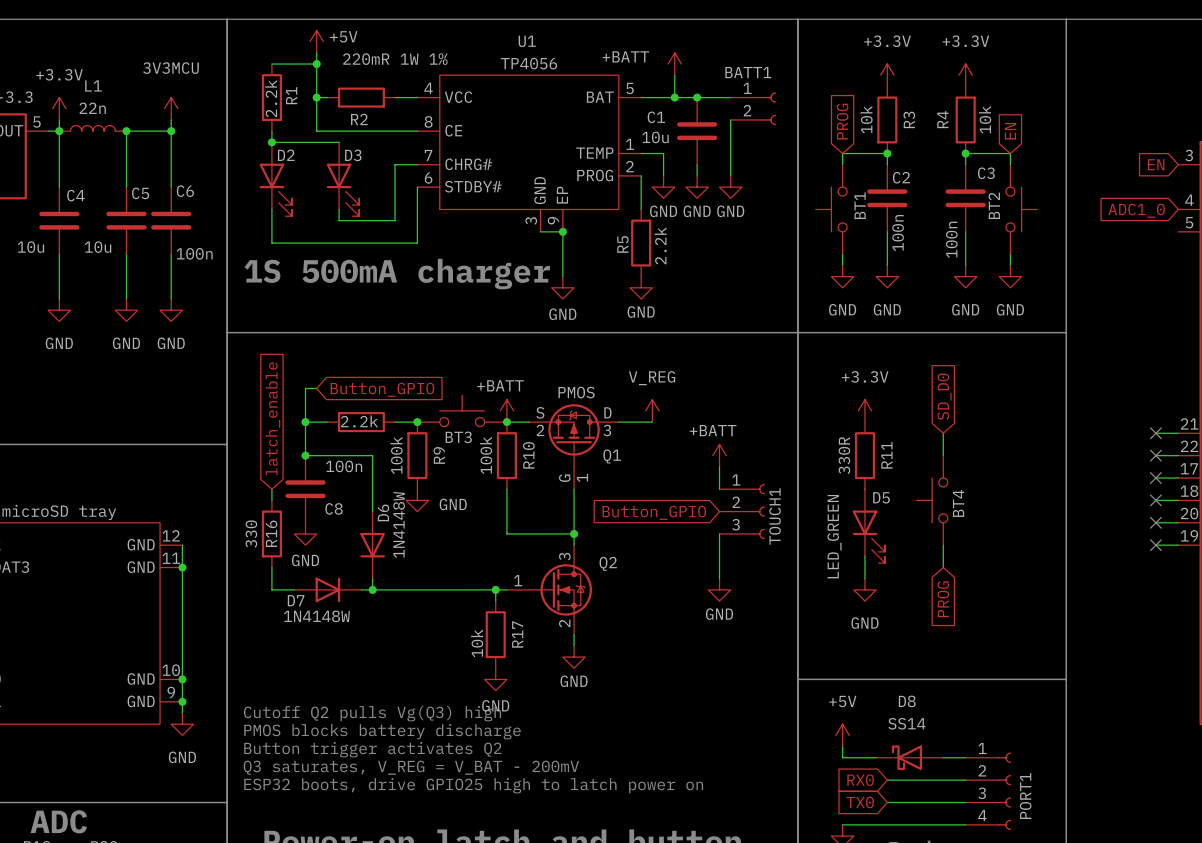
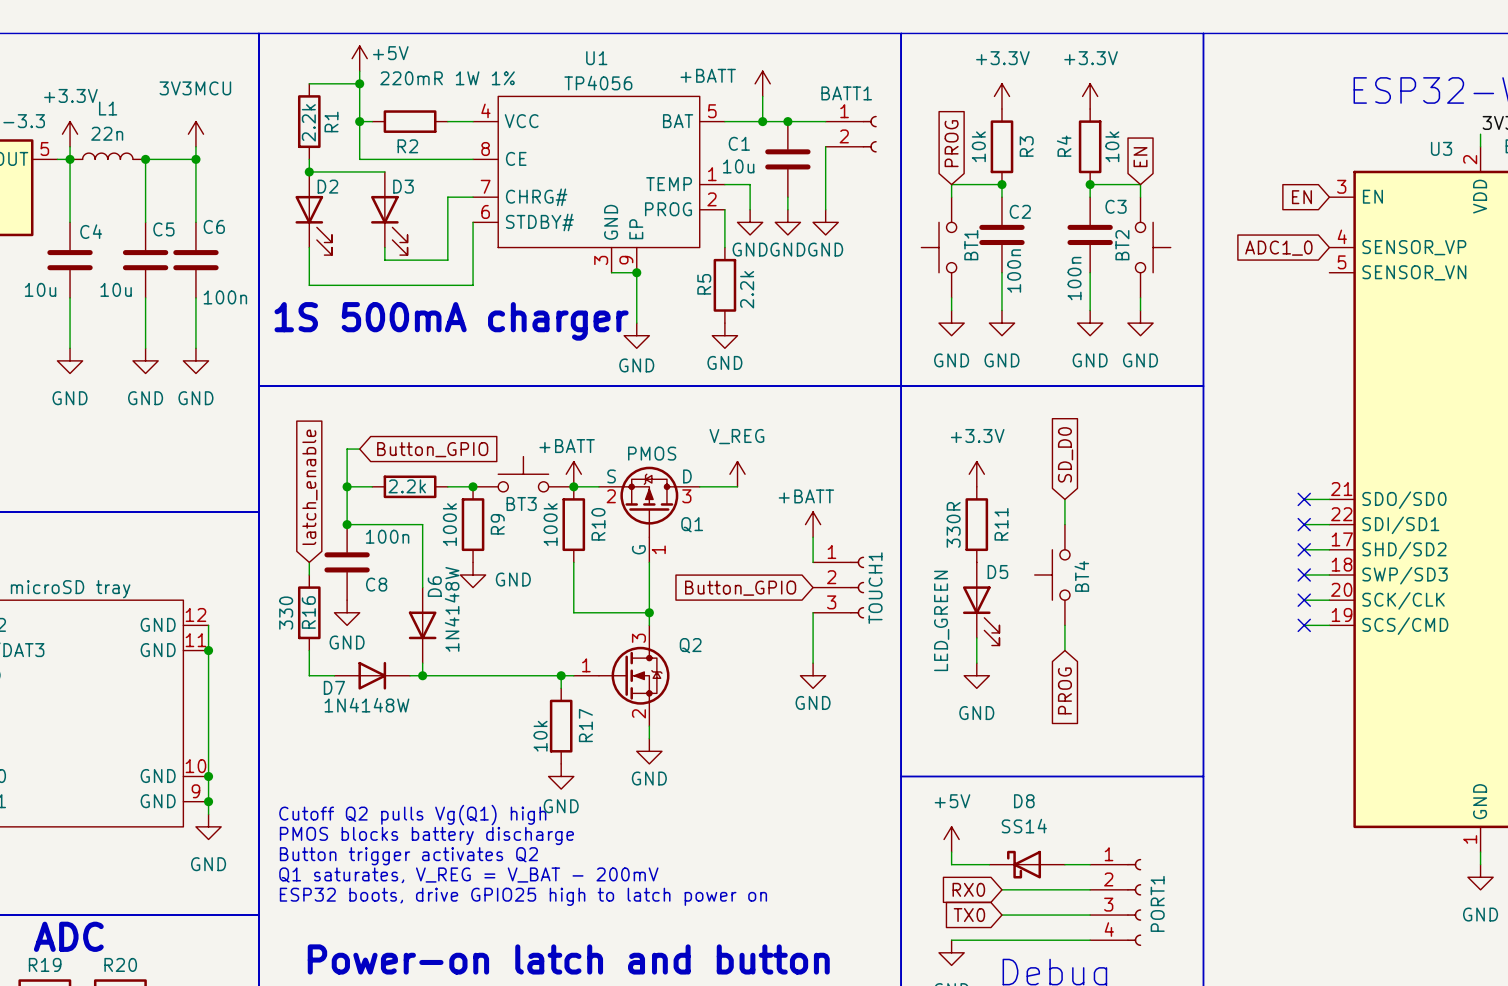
text: Cutoff Q2 pulls Vg(Q3) high (372, 713) -> Cutoff Q2 pulls Vg(Q1) high (412, 815)
text: Q3 saturates, V_REG = V_BAT - 200mV (411, 767) -> Q1 saturates, V_REG = V_BAT - 200mV (468, 875)

